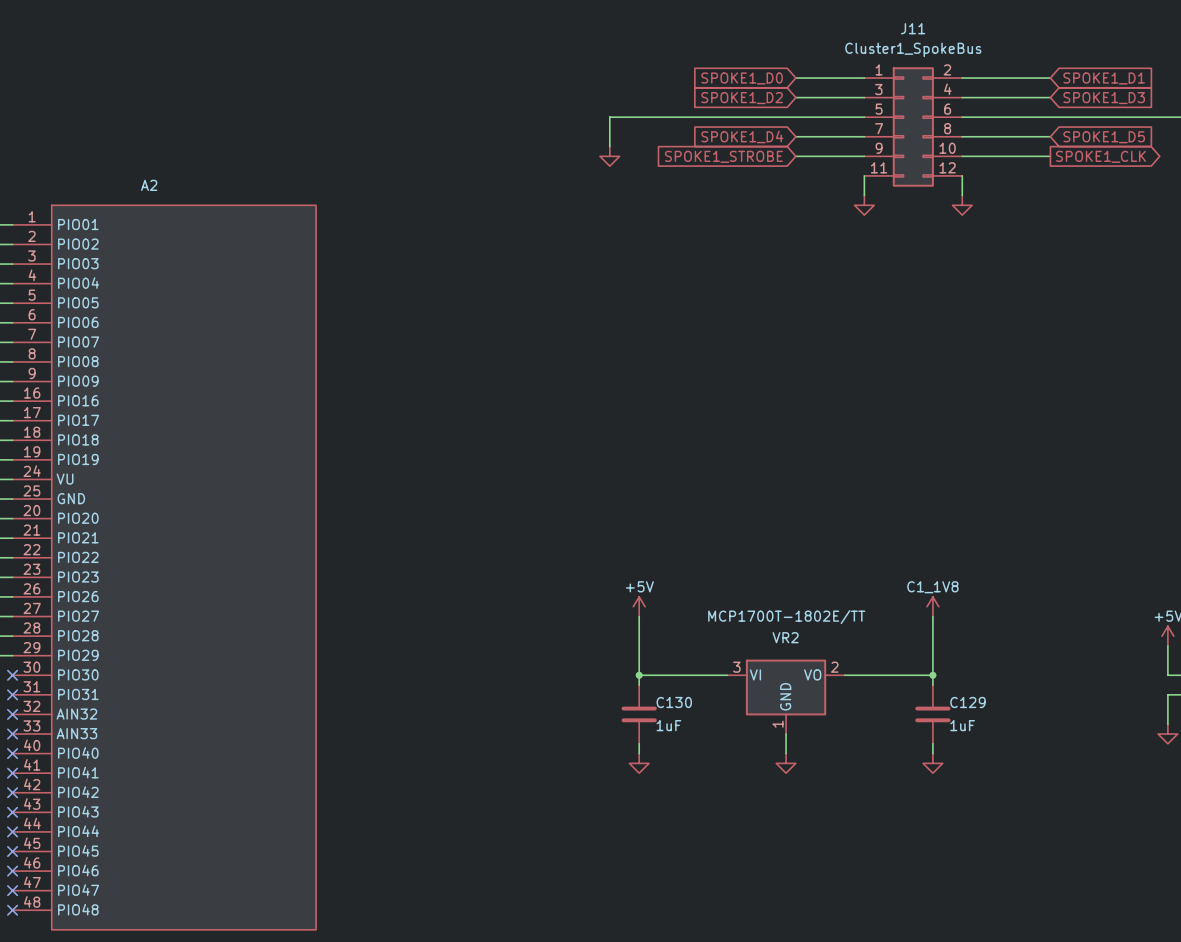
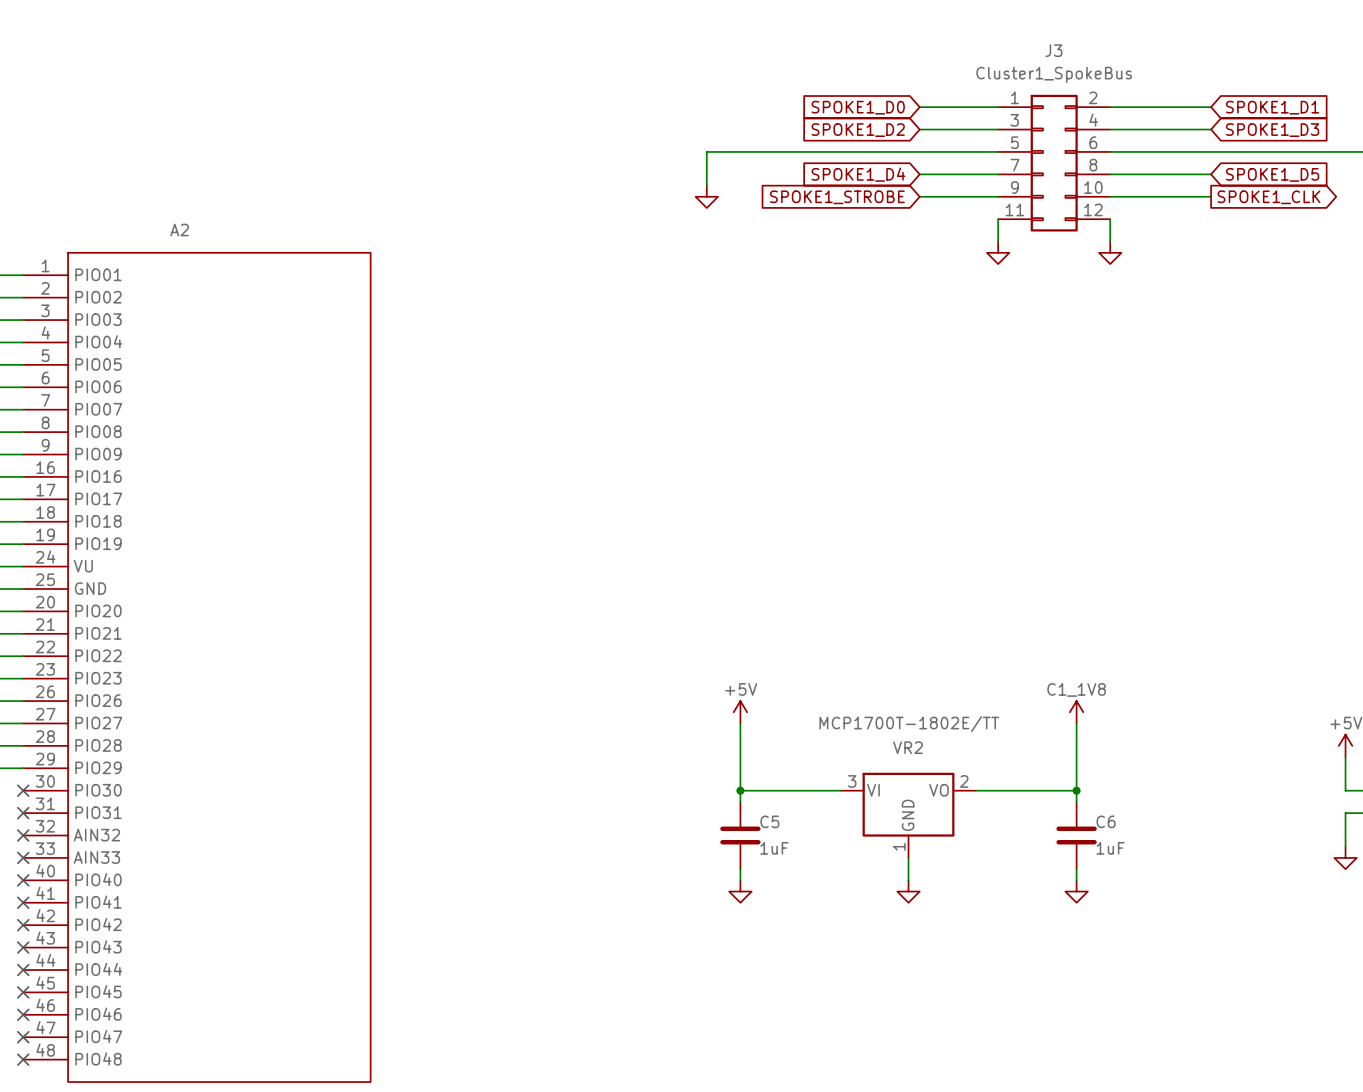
J11 name: J11 (913, 28) -> J3 (1053, 50)
C130 name: C130 (674, 702) -> C5 (769, 821)
C129 name: C129 (967, 702) -> C6 (1106, 821)

